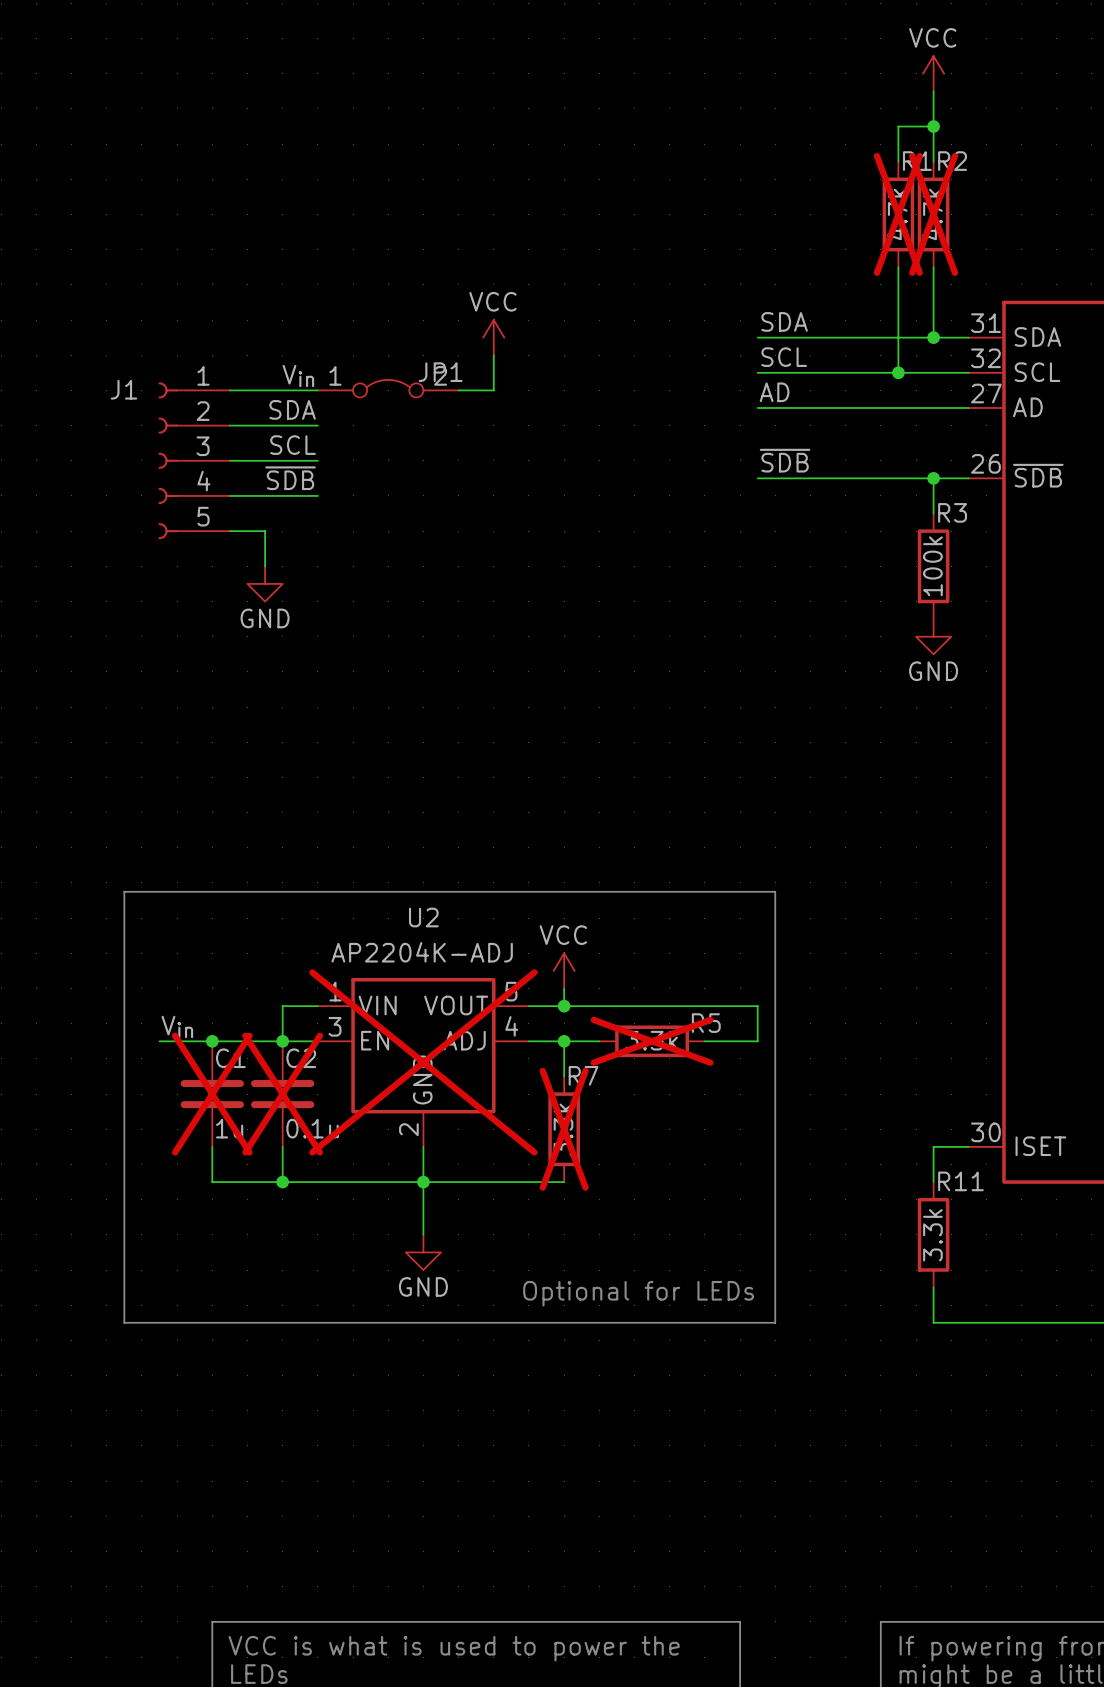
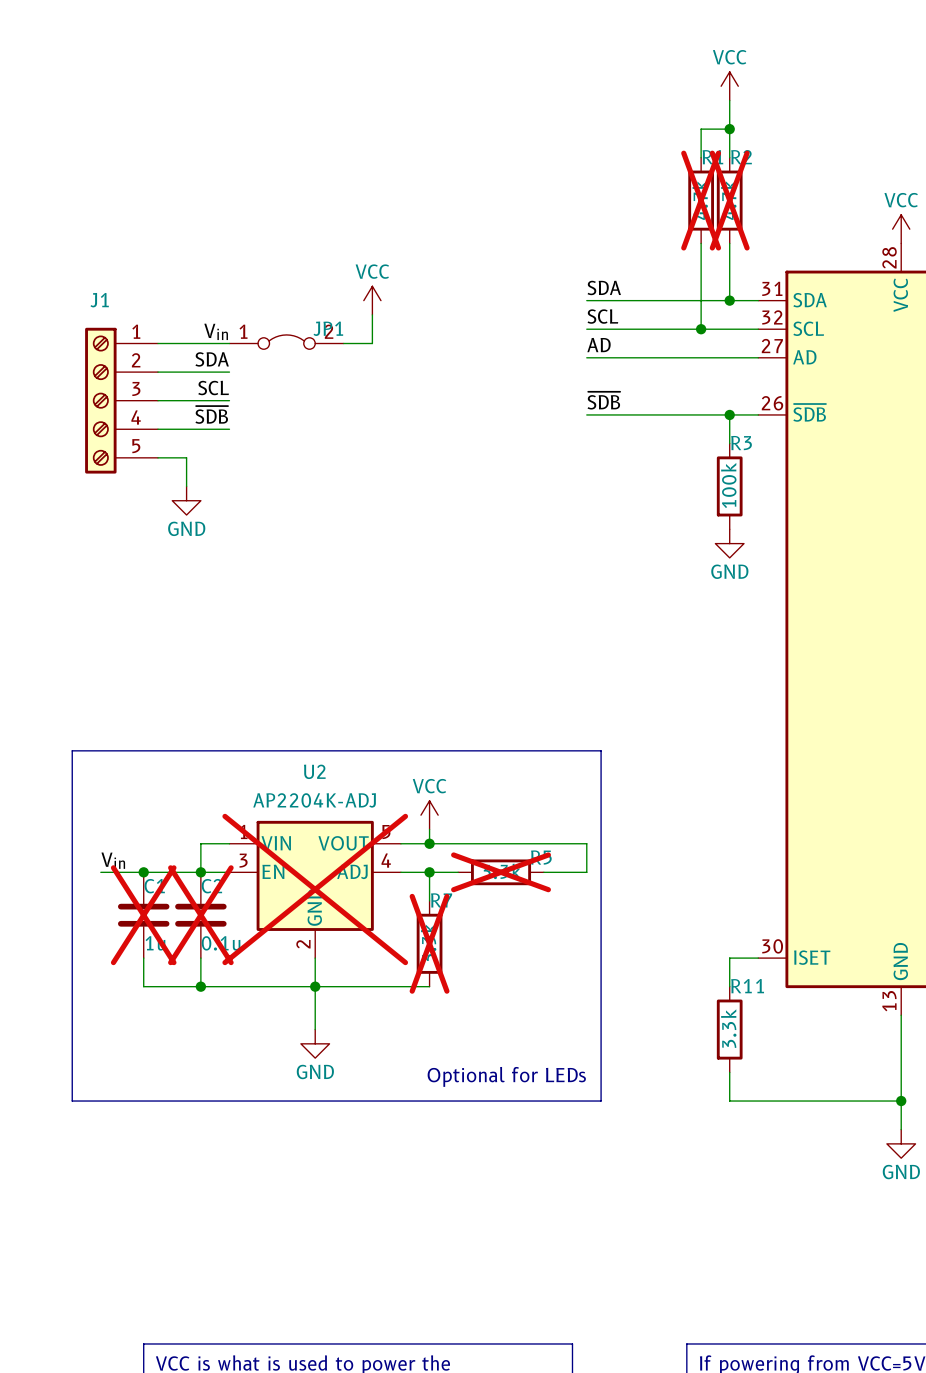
J1 symbol: [158, 382, 230, 540] -> [85, 327, 159, 474]
J1 name position: J1 (123, 389) -> J1 (99, 300)

